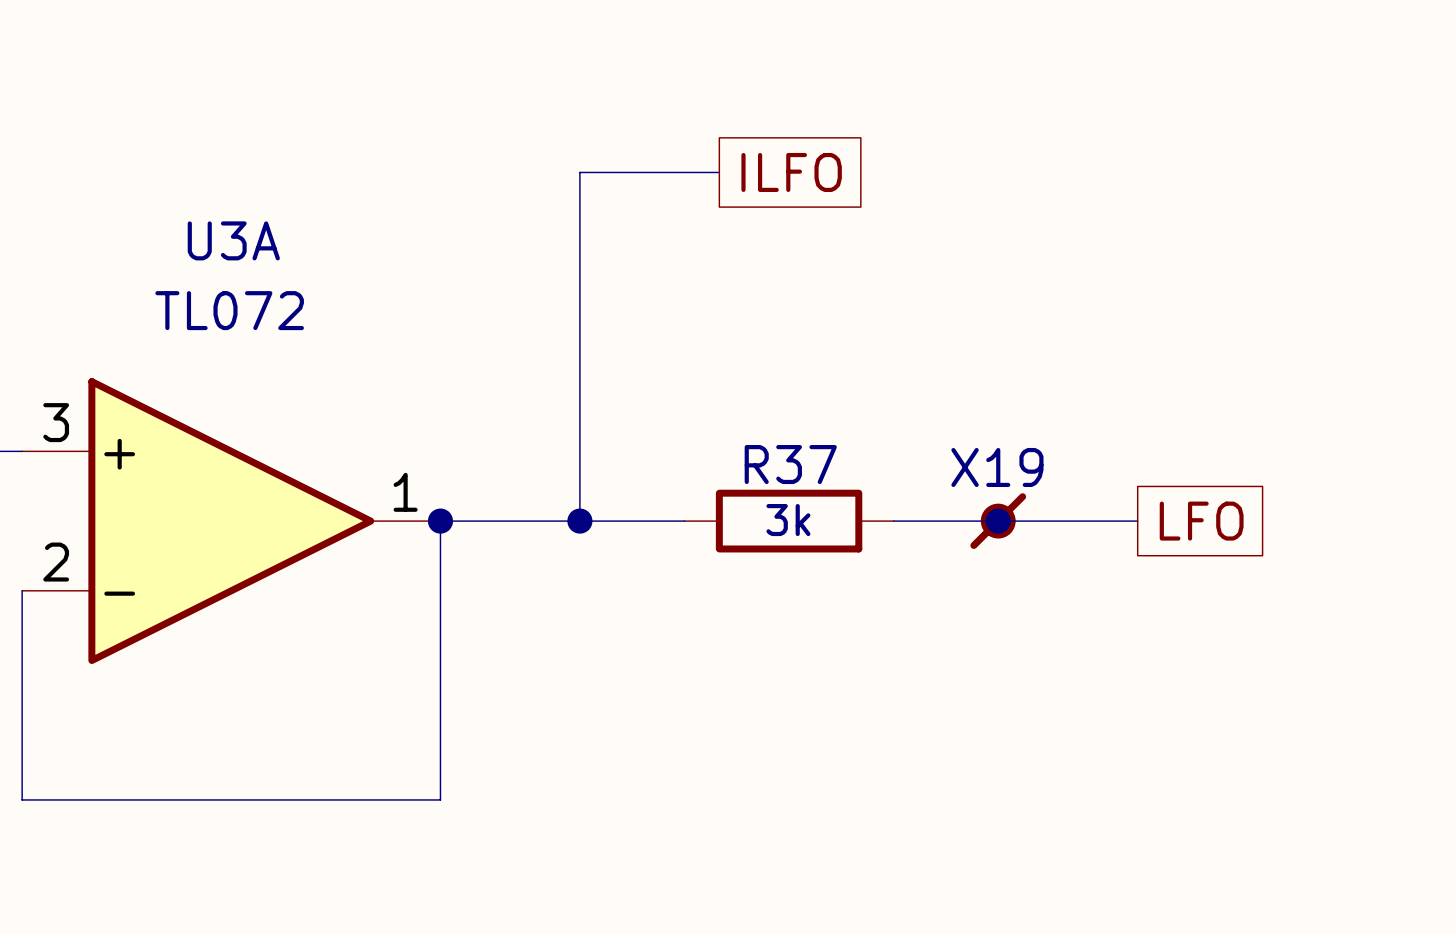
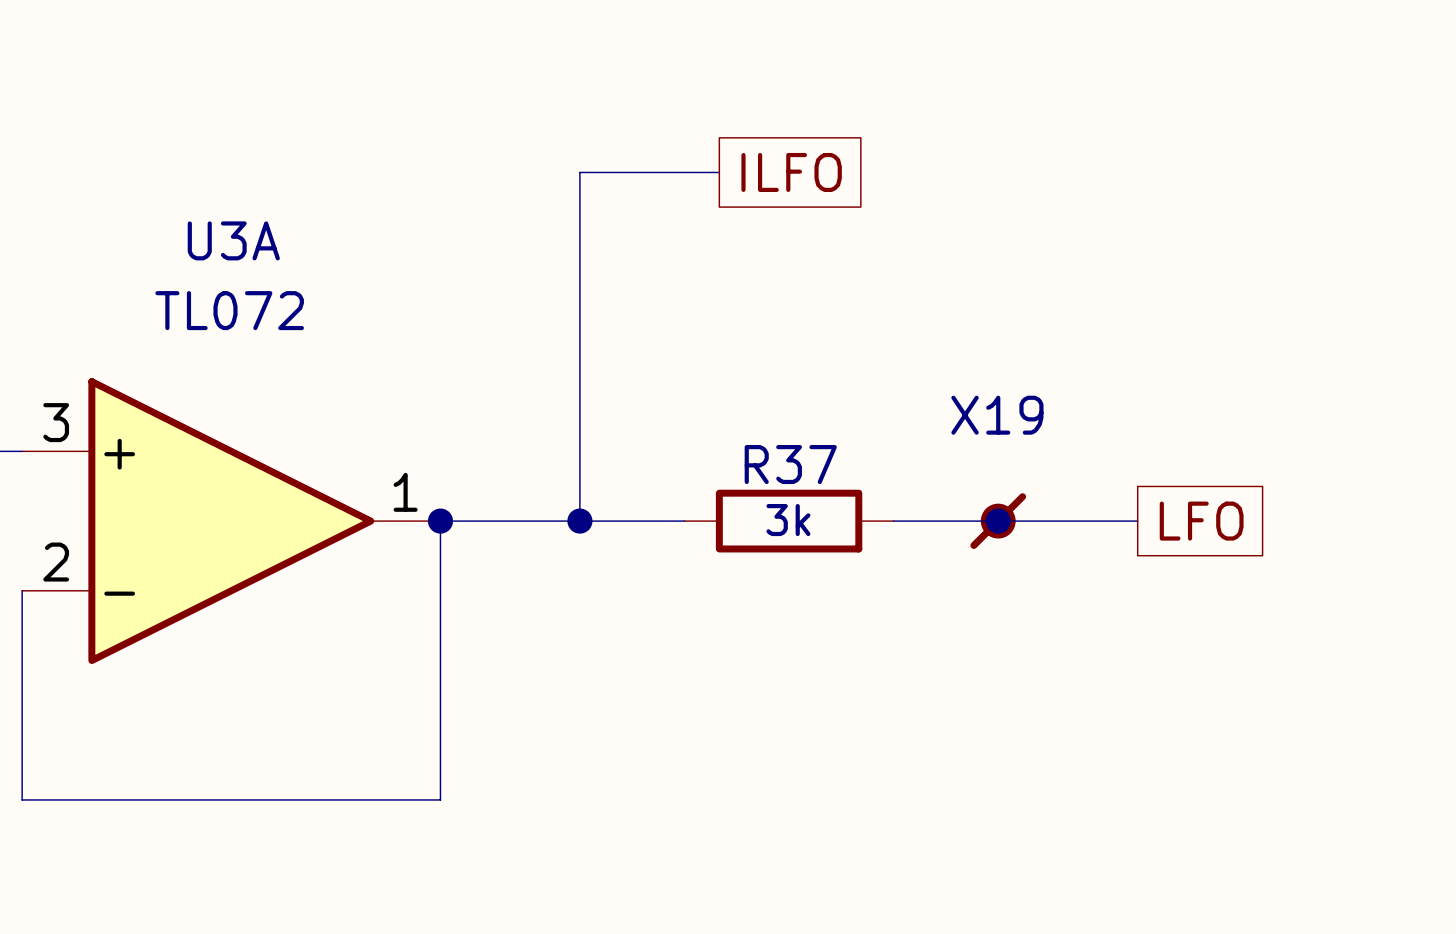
X19 name position: X19 (997, 467) -> X19 (997, 415)

